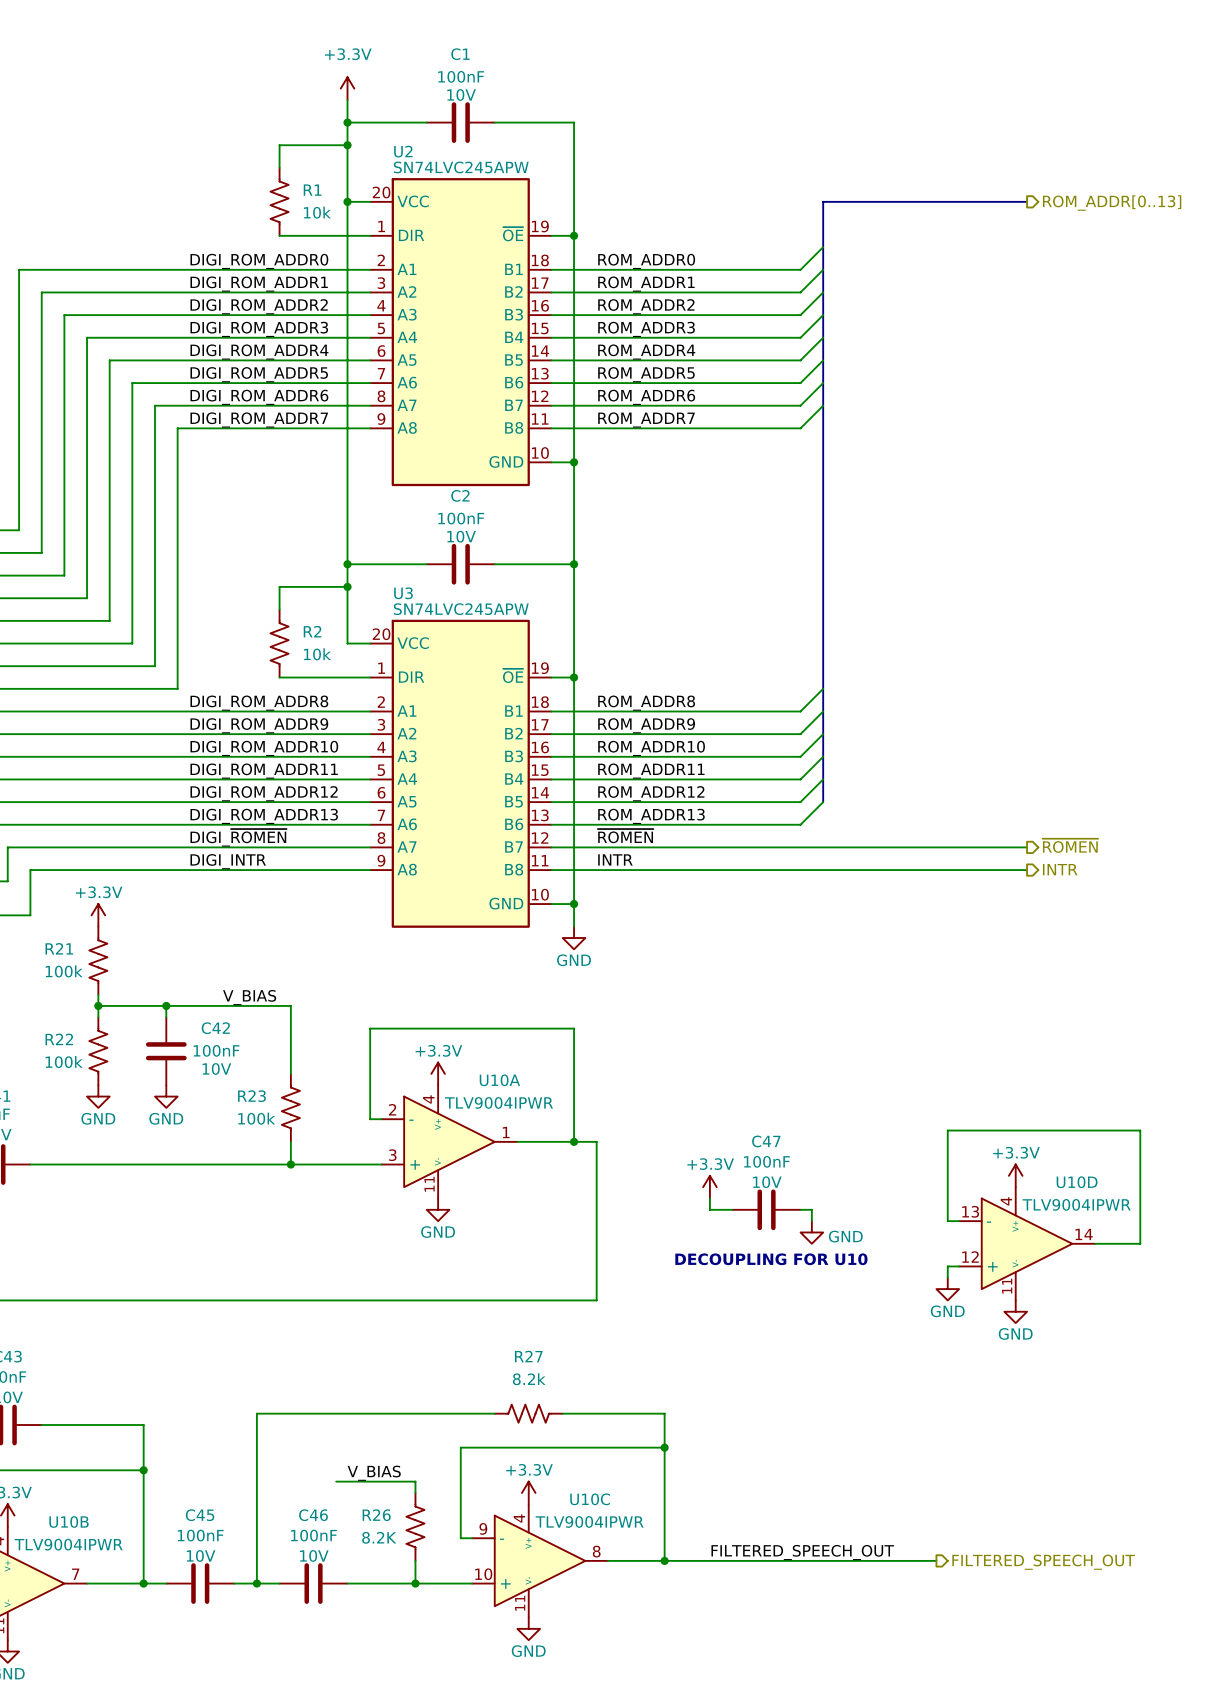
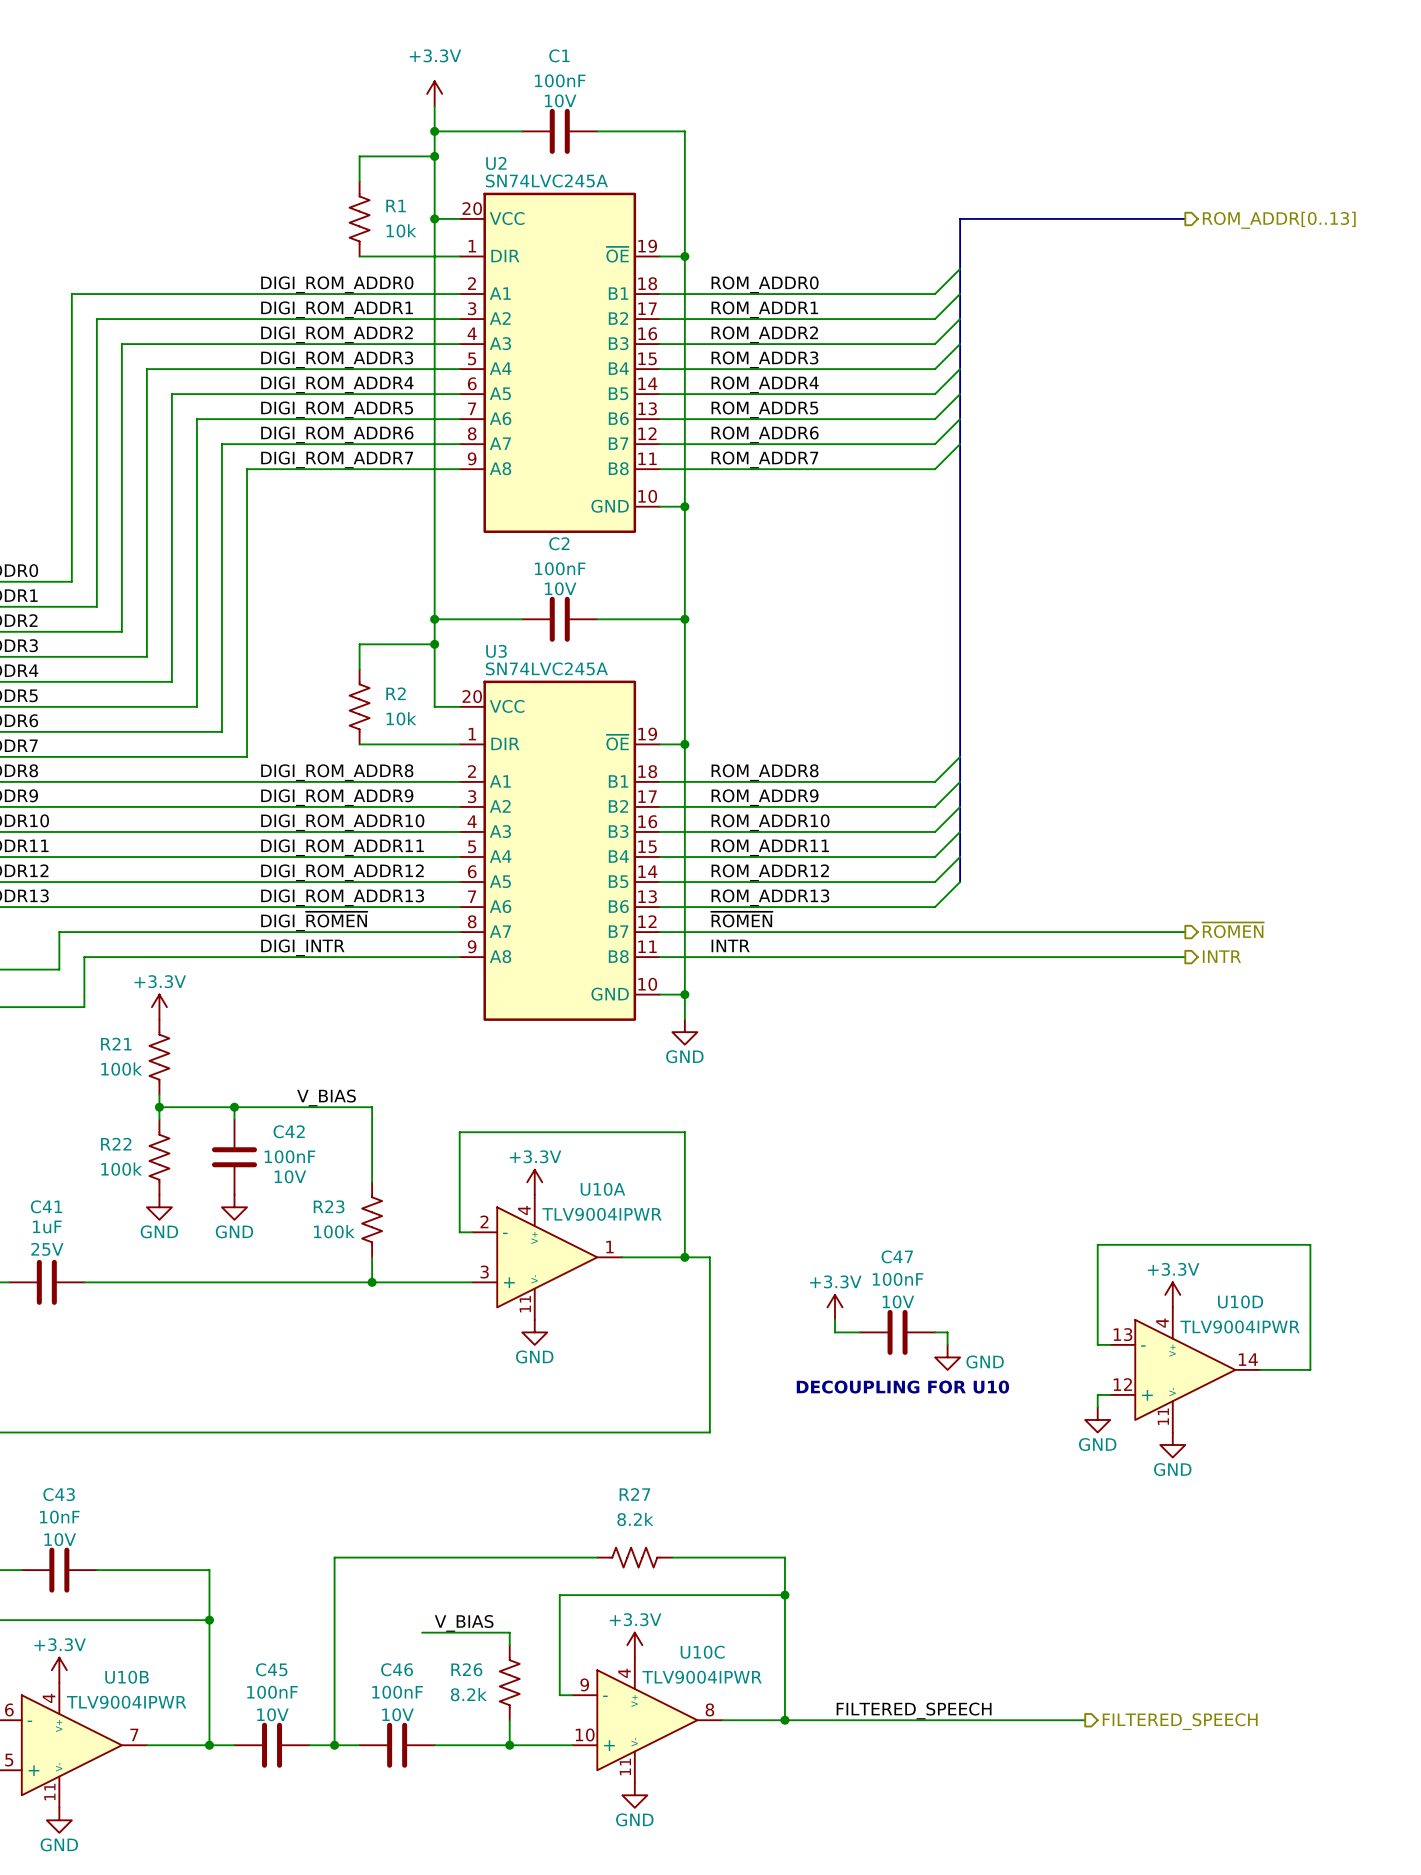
U2 value: SN74LVC245APW (461, 167) -> SN74LVC245A (546, 180)
U3 value: SN74LVC245APW (461, 609) -> SN74LVC245A (546, 668)
R26 value: 8.2K (379, 1537) -> 8.2k (468, 1694)
label: FILTERED_SPEECH_OUT (802, 1552) -> FILTERED_SPEECH (914, 1710)
hierarchical label: FILTERED_SPEECH_OUT (1043, 1562) -> FILTERED_SPEECH (1180, 1721)

